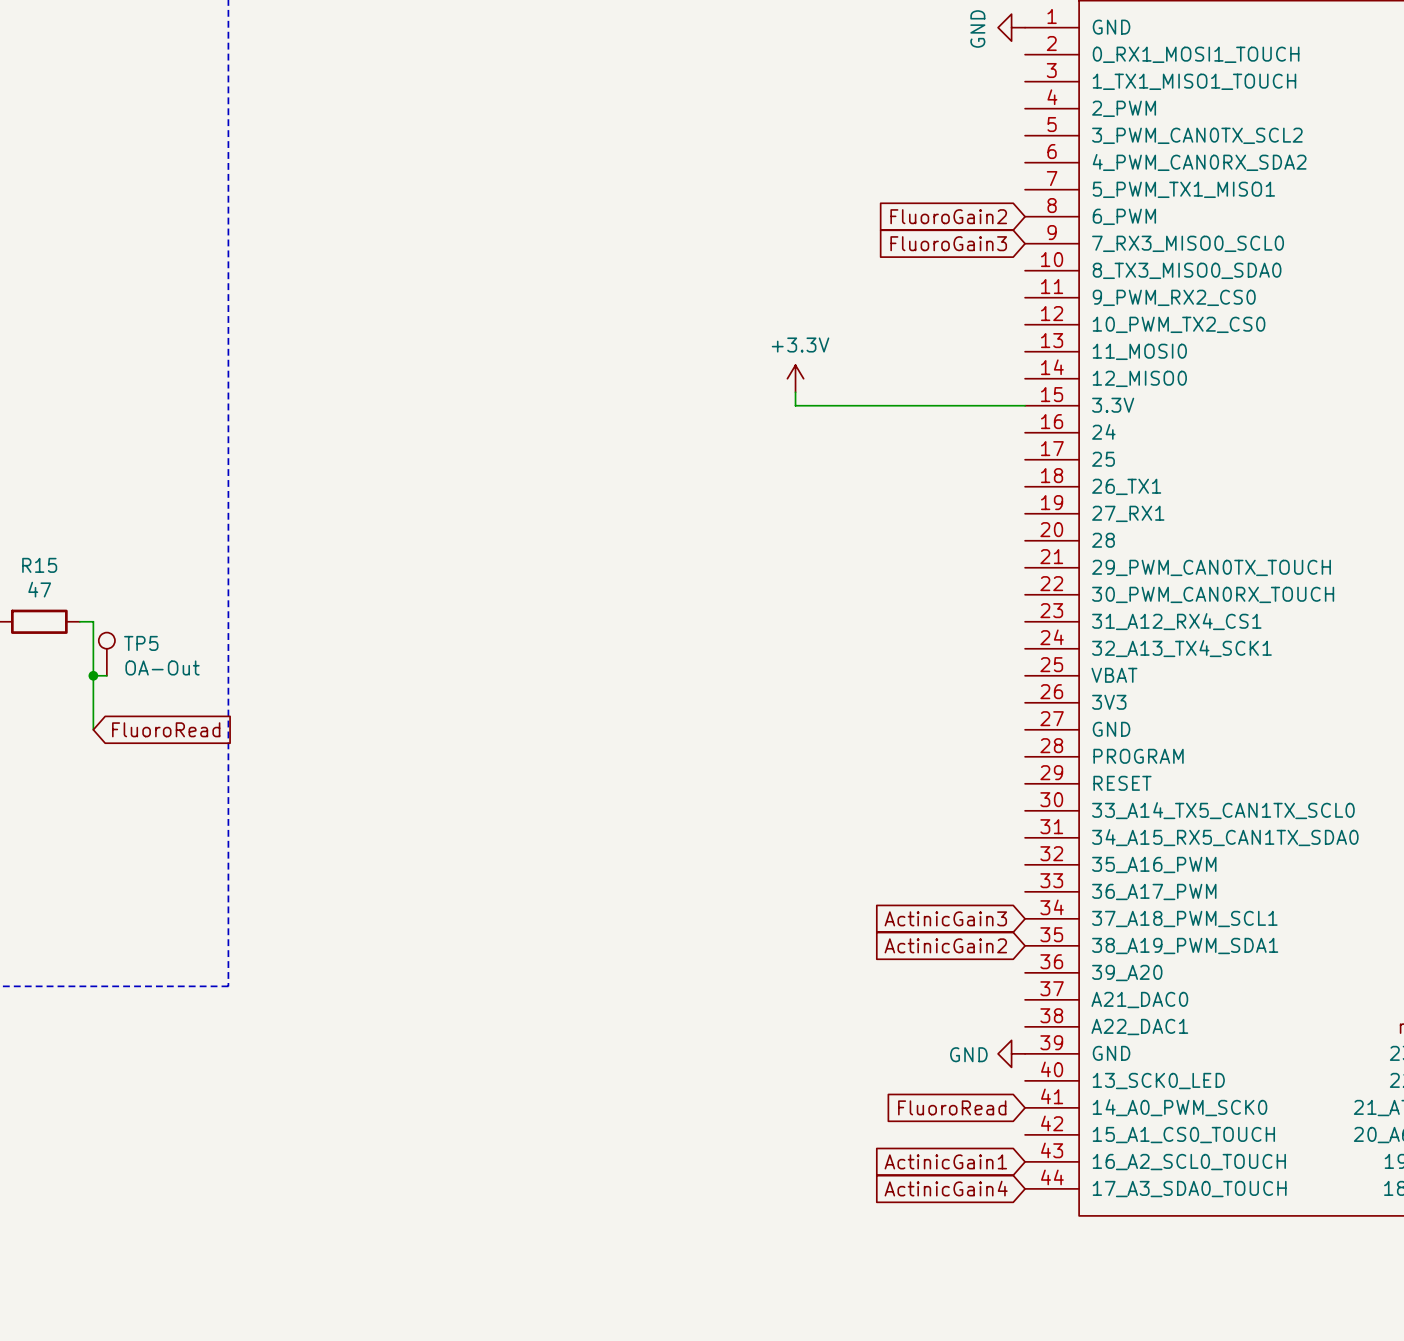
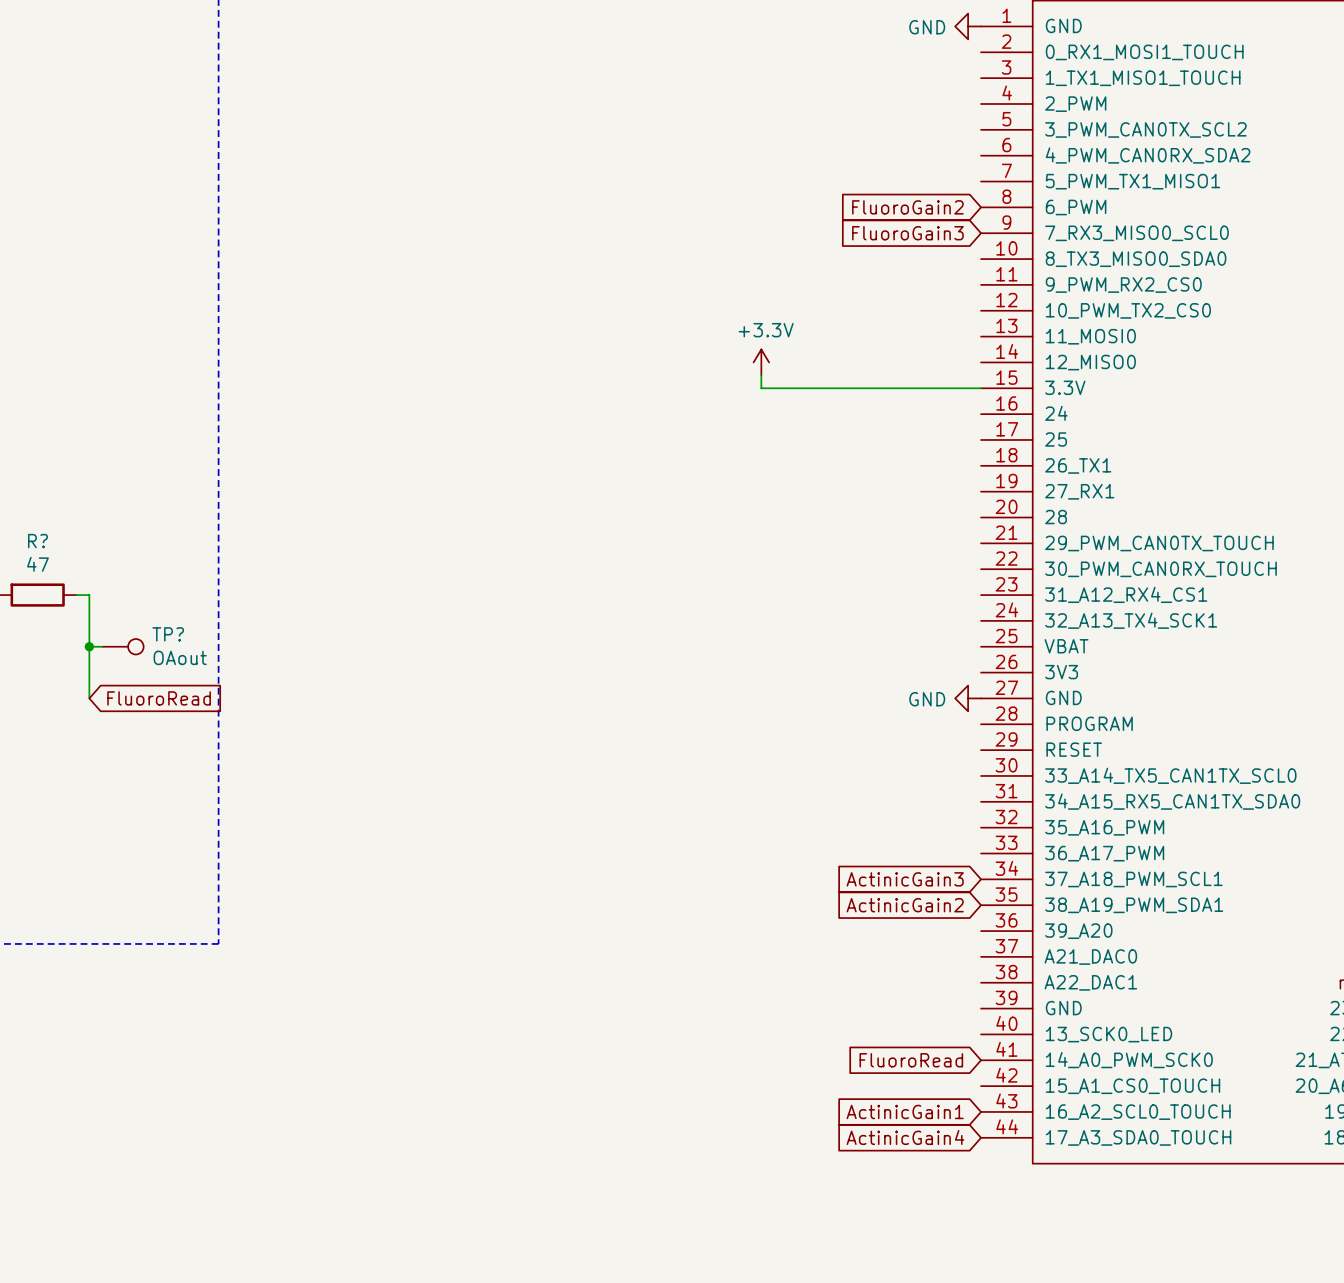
power symbol text rotation: 0° (977, 28) -> 90° clockwise (927, 27)
R15 name: R15 (39, 565) -> R? (37, 541)
TP5: OA-Out (106, 654) -> none
TP?: none -> OAout (122, 646)
power symbol: none -> GND (968, 698)
power symbol: GND (1011, 1053) -> none

